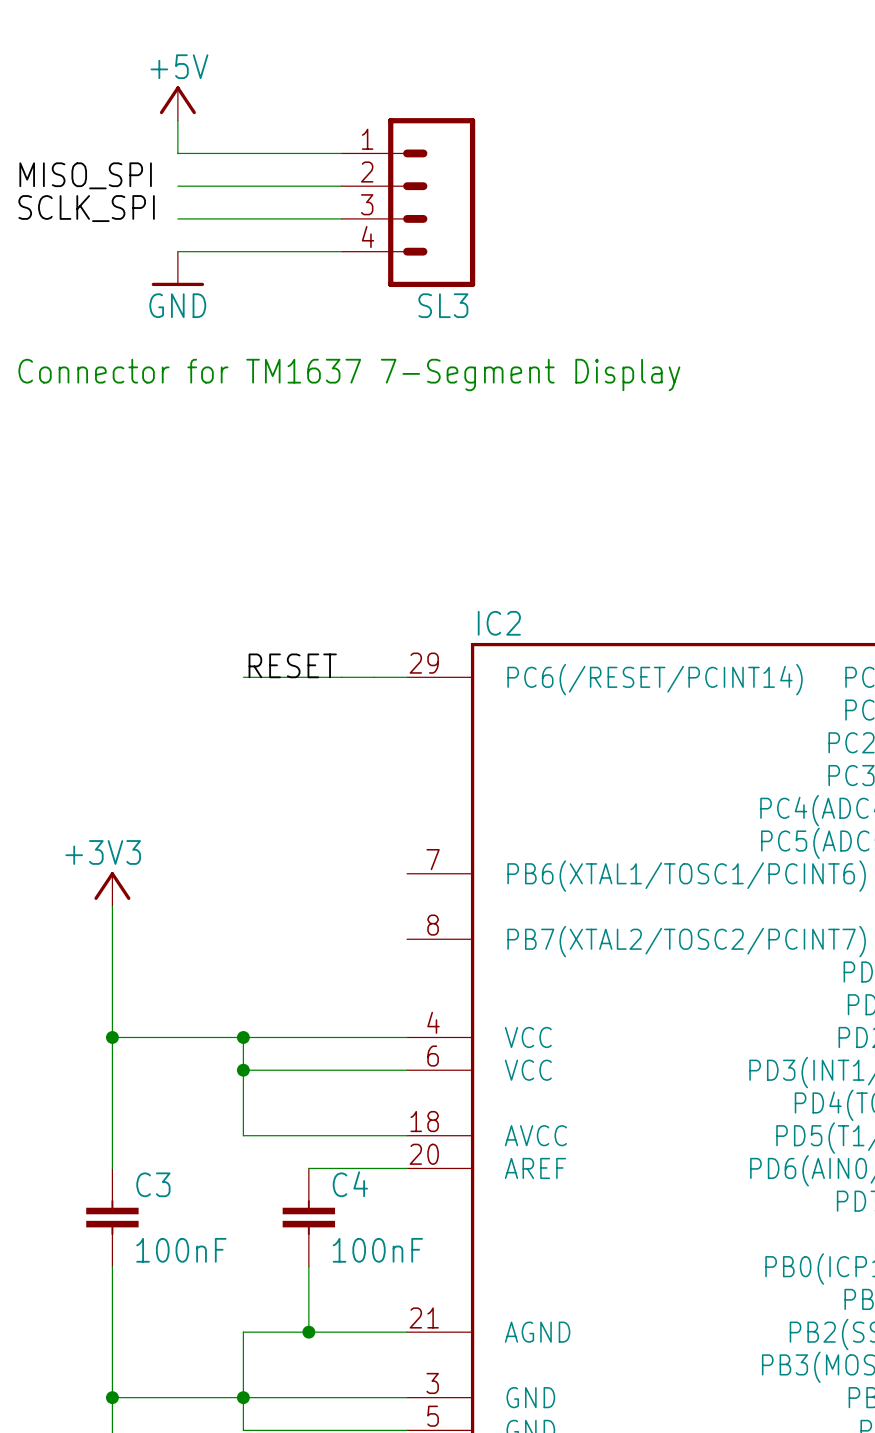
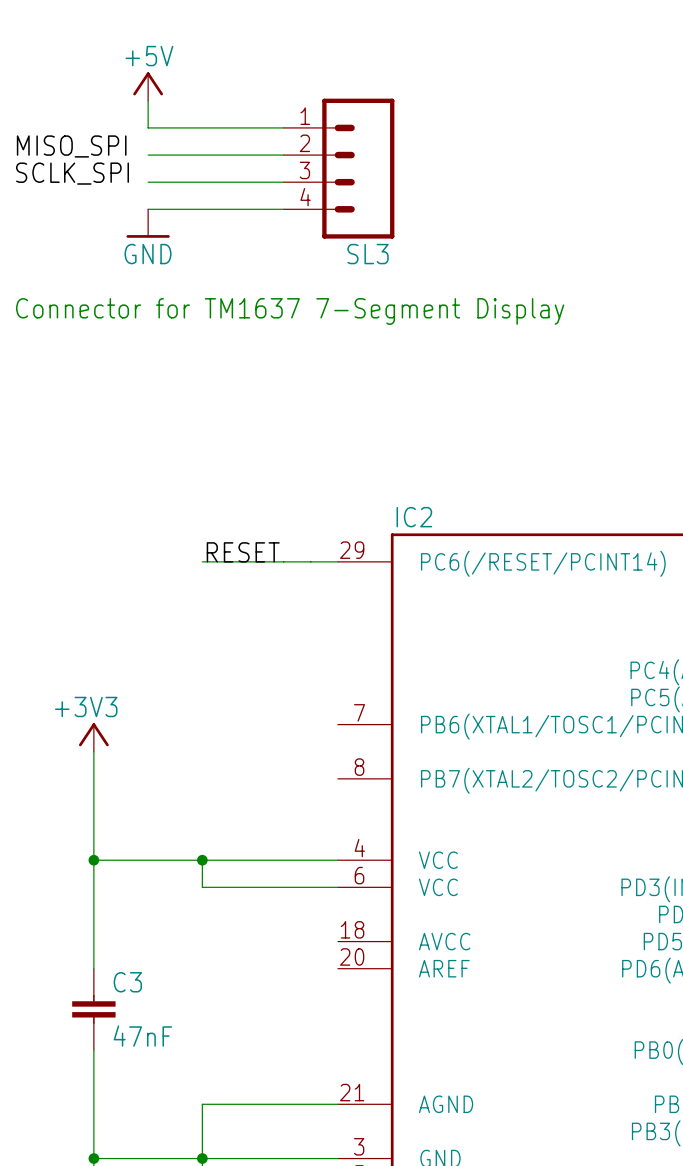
wire: (243, 1070) (243, 1135) (407, 1135) -> none
junction: (243, 1070) -> none
wire: (308, 1168) (407, 1168) -> none
C4: 100nF (308, 1217) -> none
C3 value: 100nF (181, 1250) -> 47nF (142, 1036)
wire: (308, 1266) (308, 1332) -> none
junction: (308, 1332) -> none

